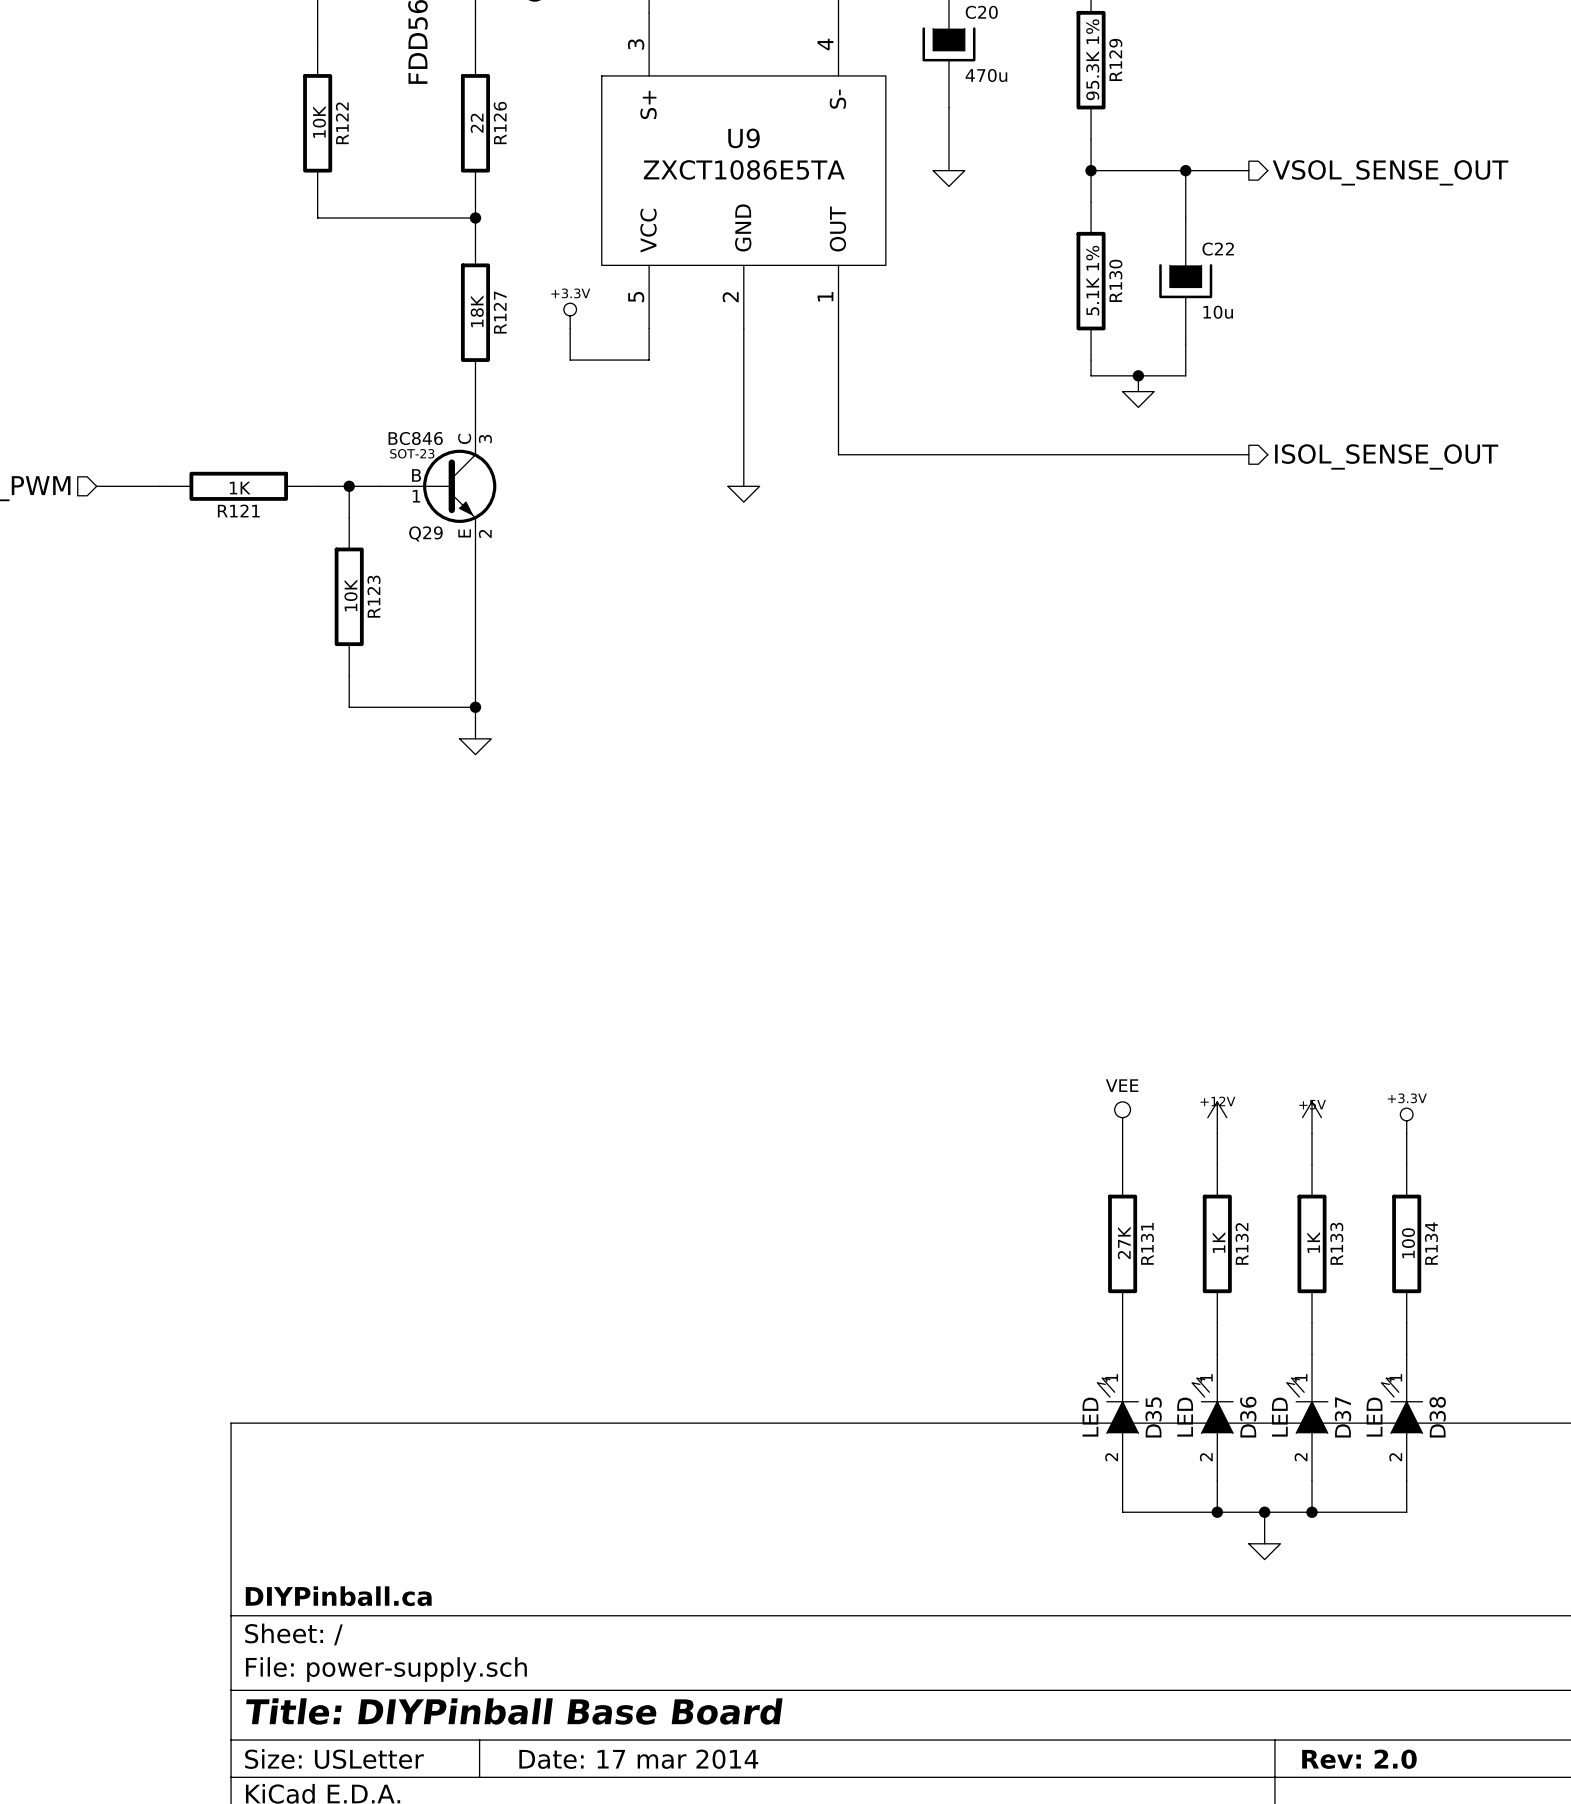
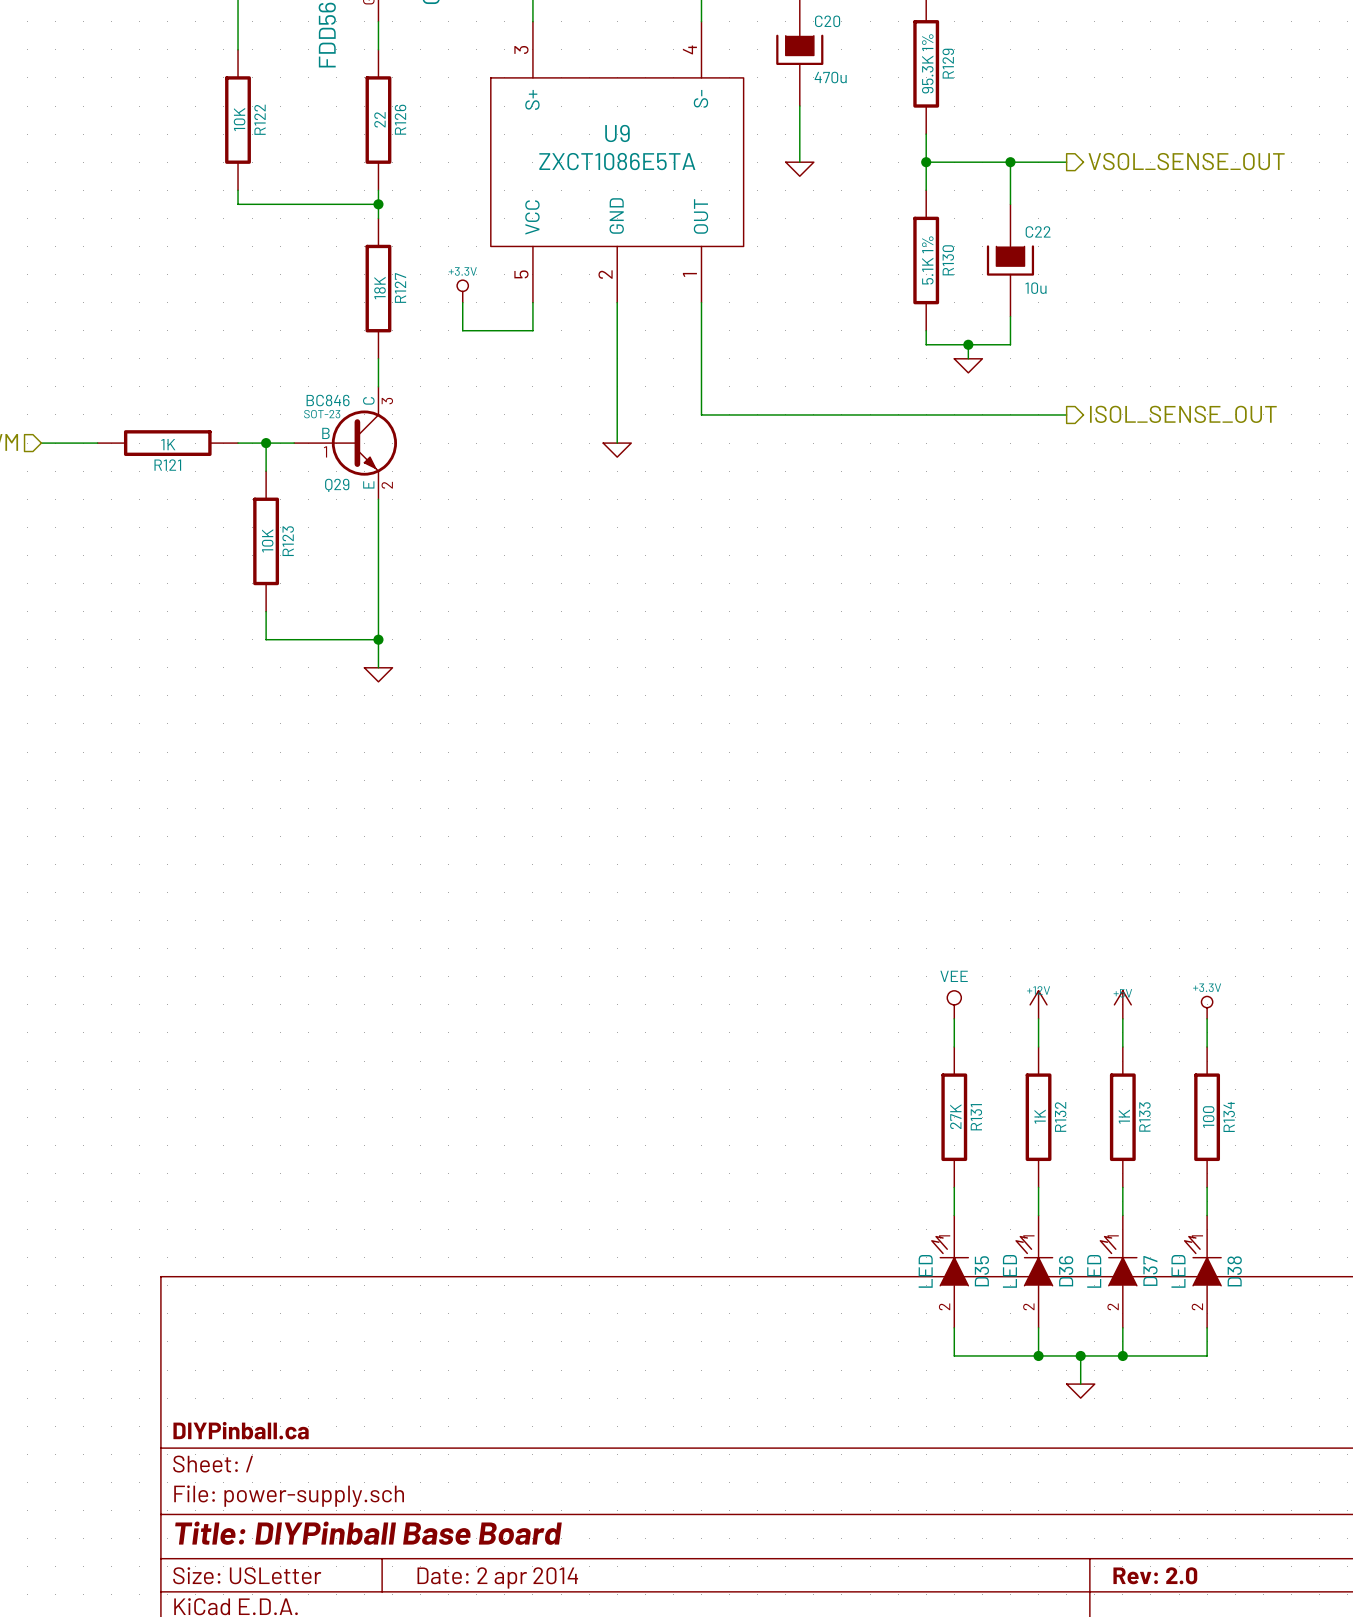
title block: Date: 17 mar 2014 (638, 1759) -> Date: 2 apr 2014 (497, 1577)

